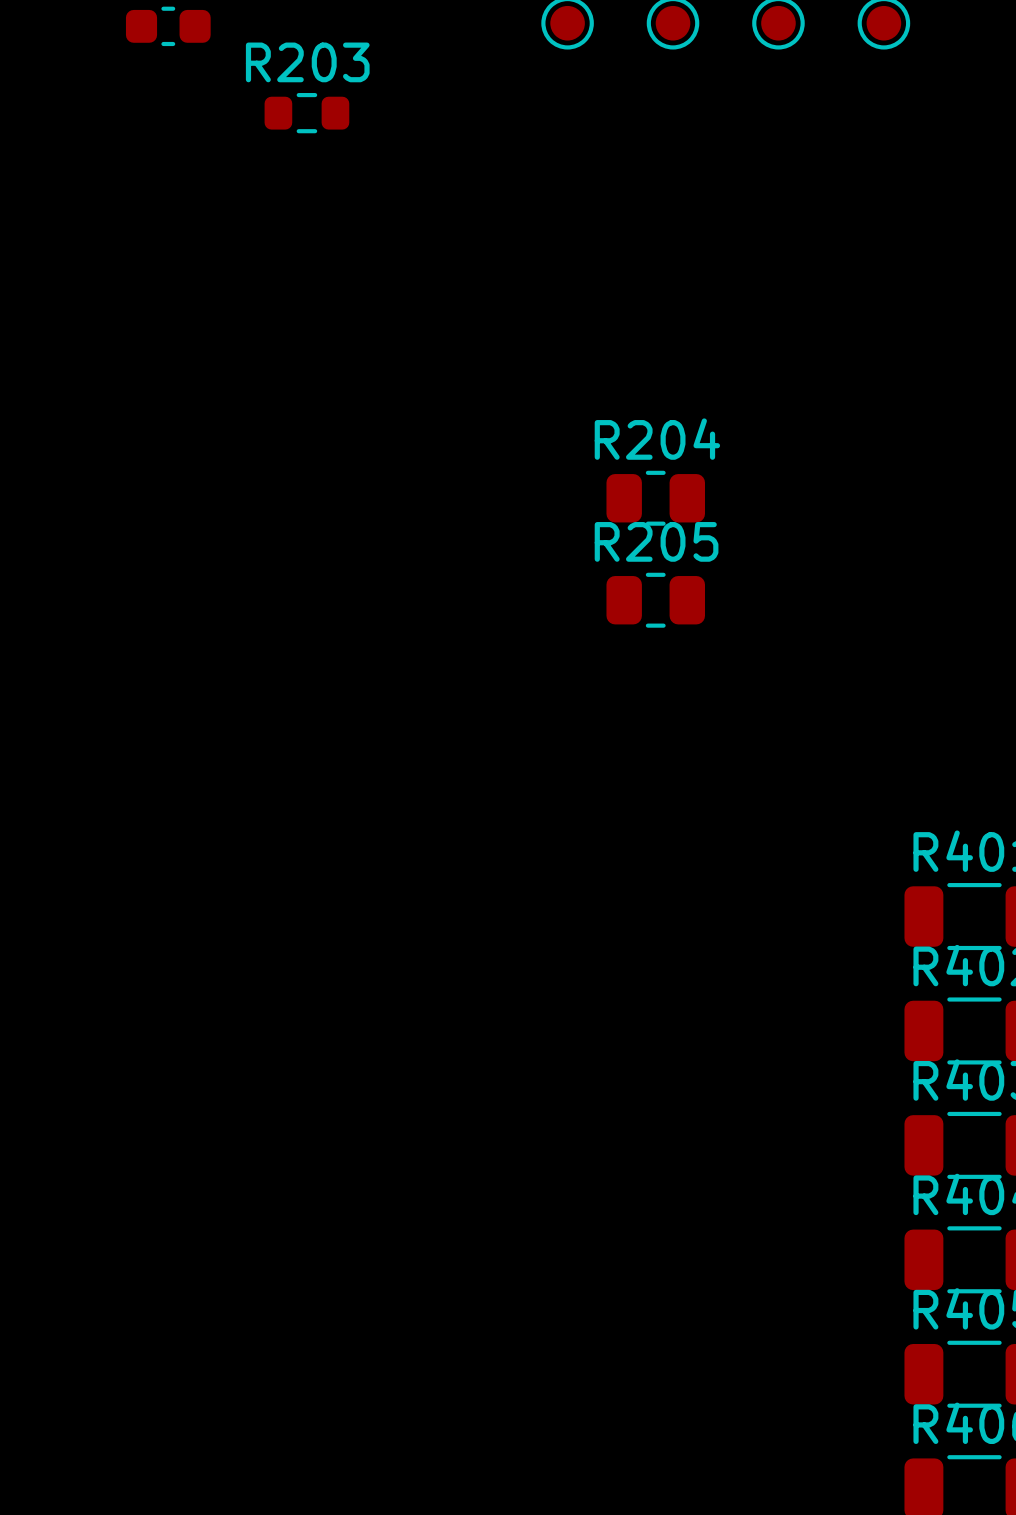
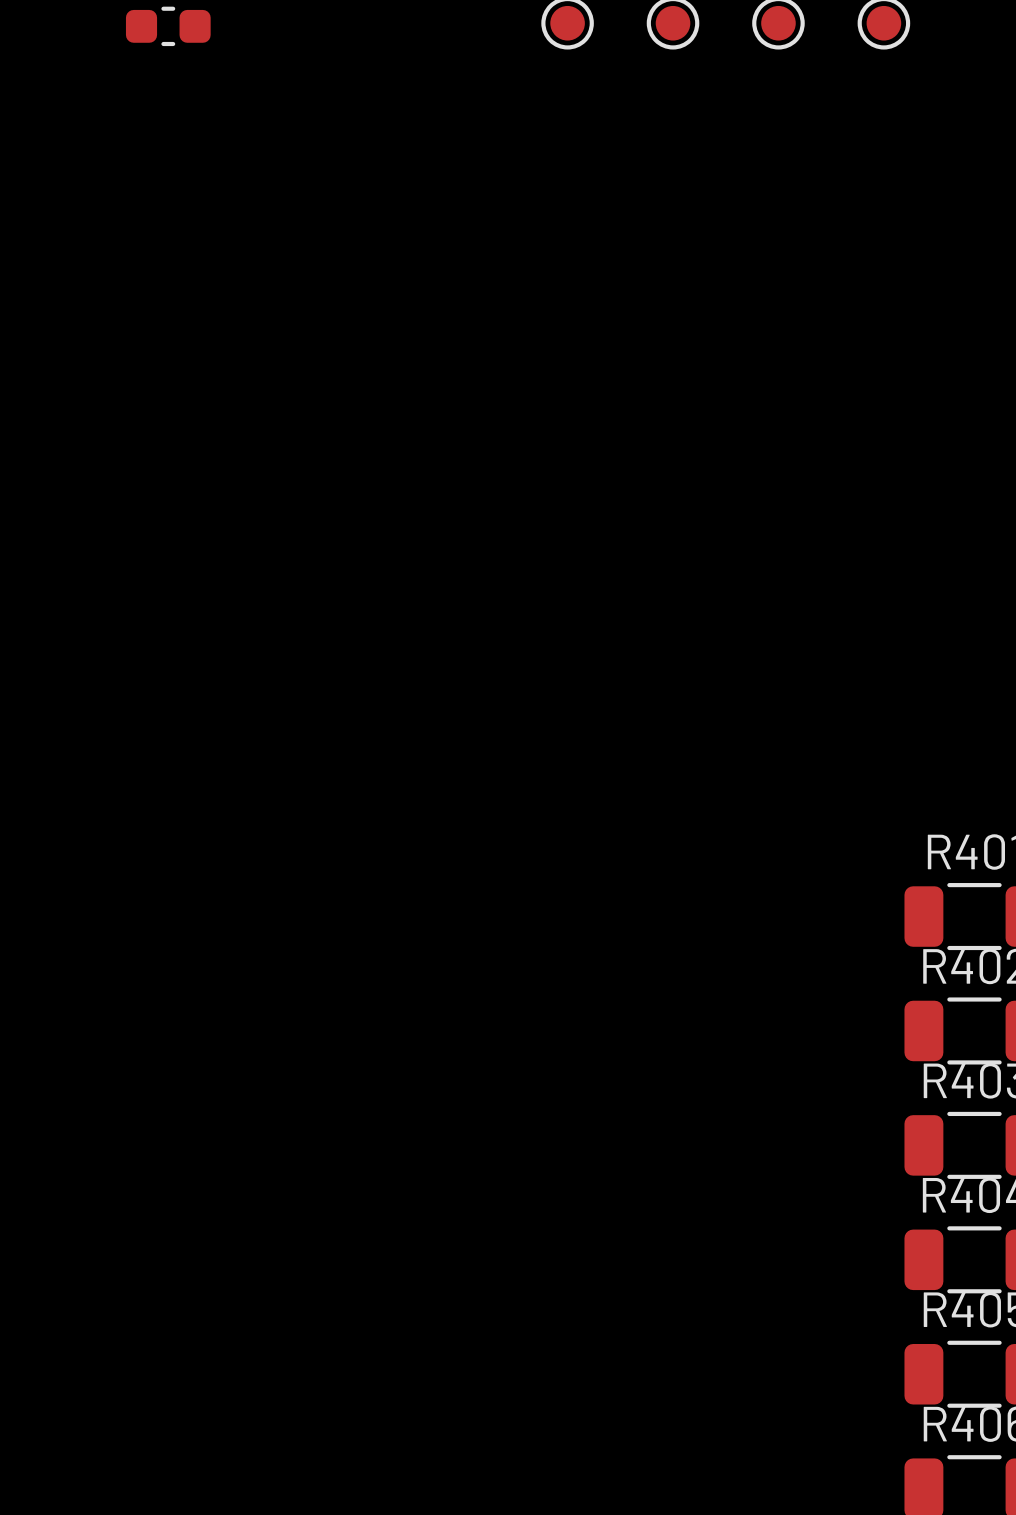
R203: (306, 113) -> none
R204: (655, 498) -> none
R205: (655, 600) -> none

